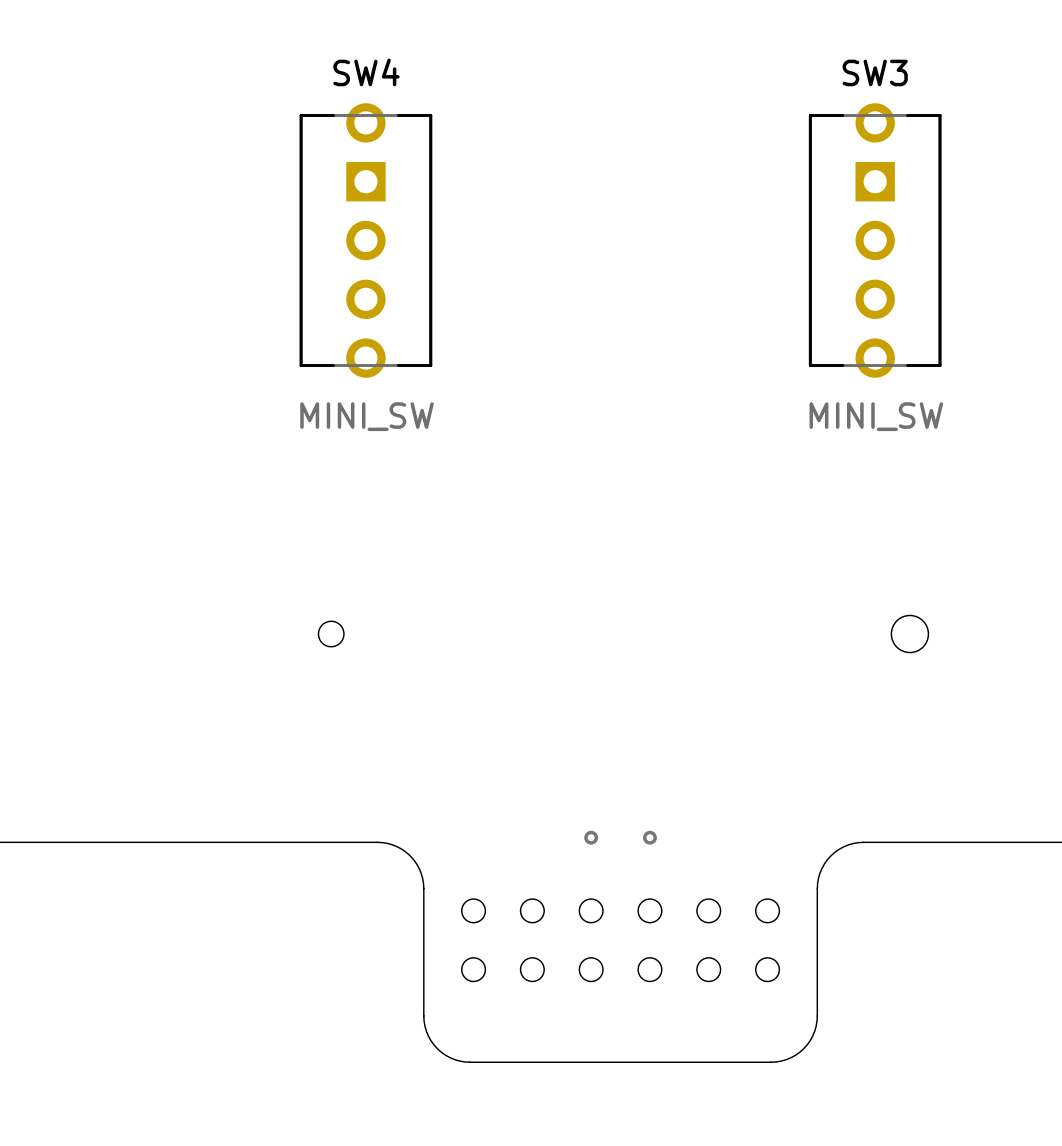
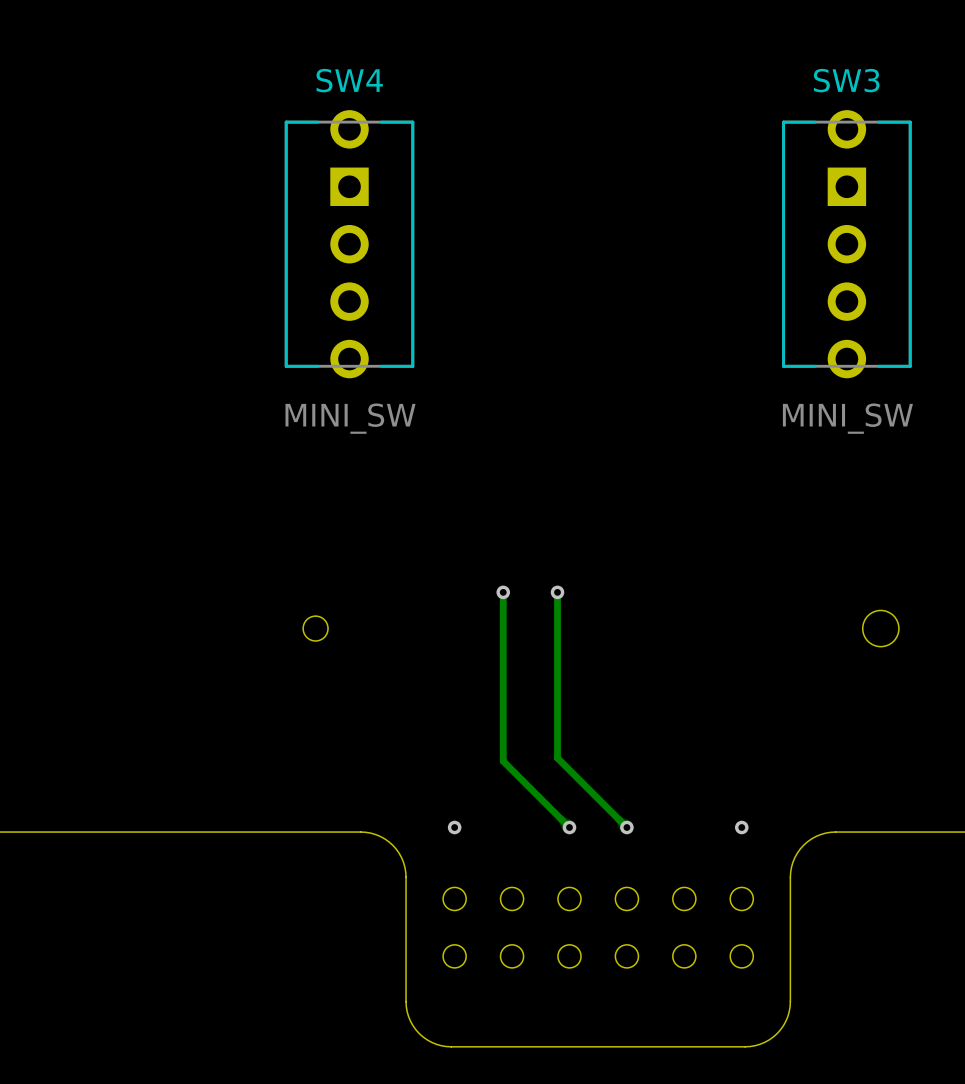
track: none -> (503, 592) (503, 761) (569, 827)
via: none -> (503, 592)
track: none -> (557, 592) (557, 758) (626, 827)
via: none -> (557, 592)
via: none -> (454, 827)
via: none -> (741, 827)

